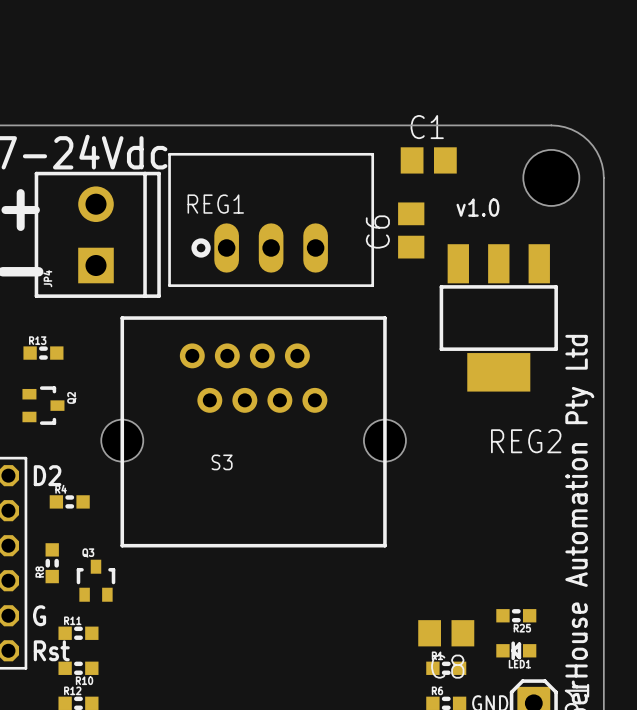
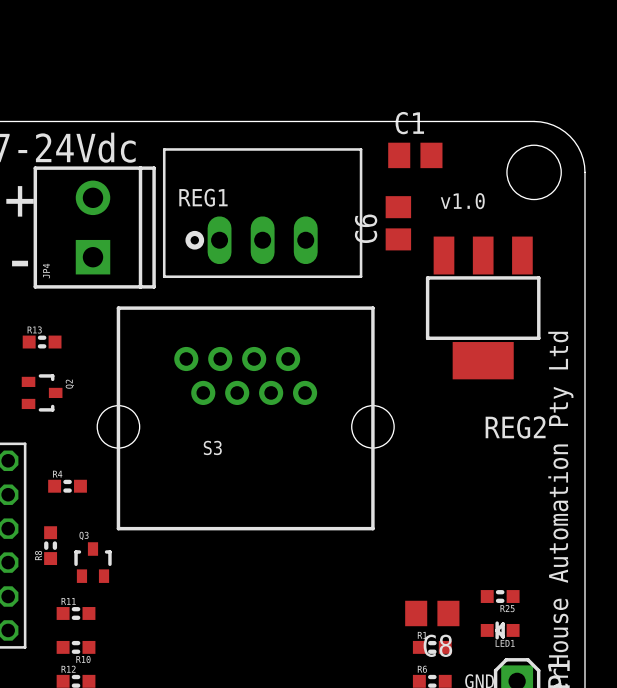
S3 footprint: [101, 316, 406, 548] -> [97, 306, 395, 531]
text: D2 (47, 475) -> none
text: G (39, 615) -> none
text: Rst (51, 650) -> none

